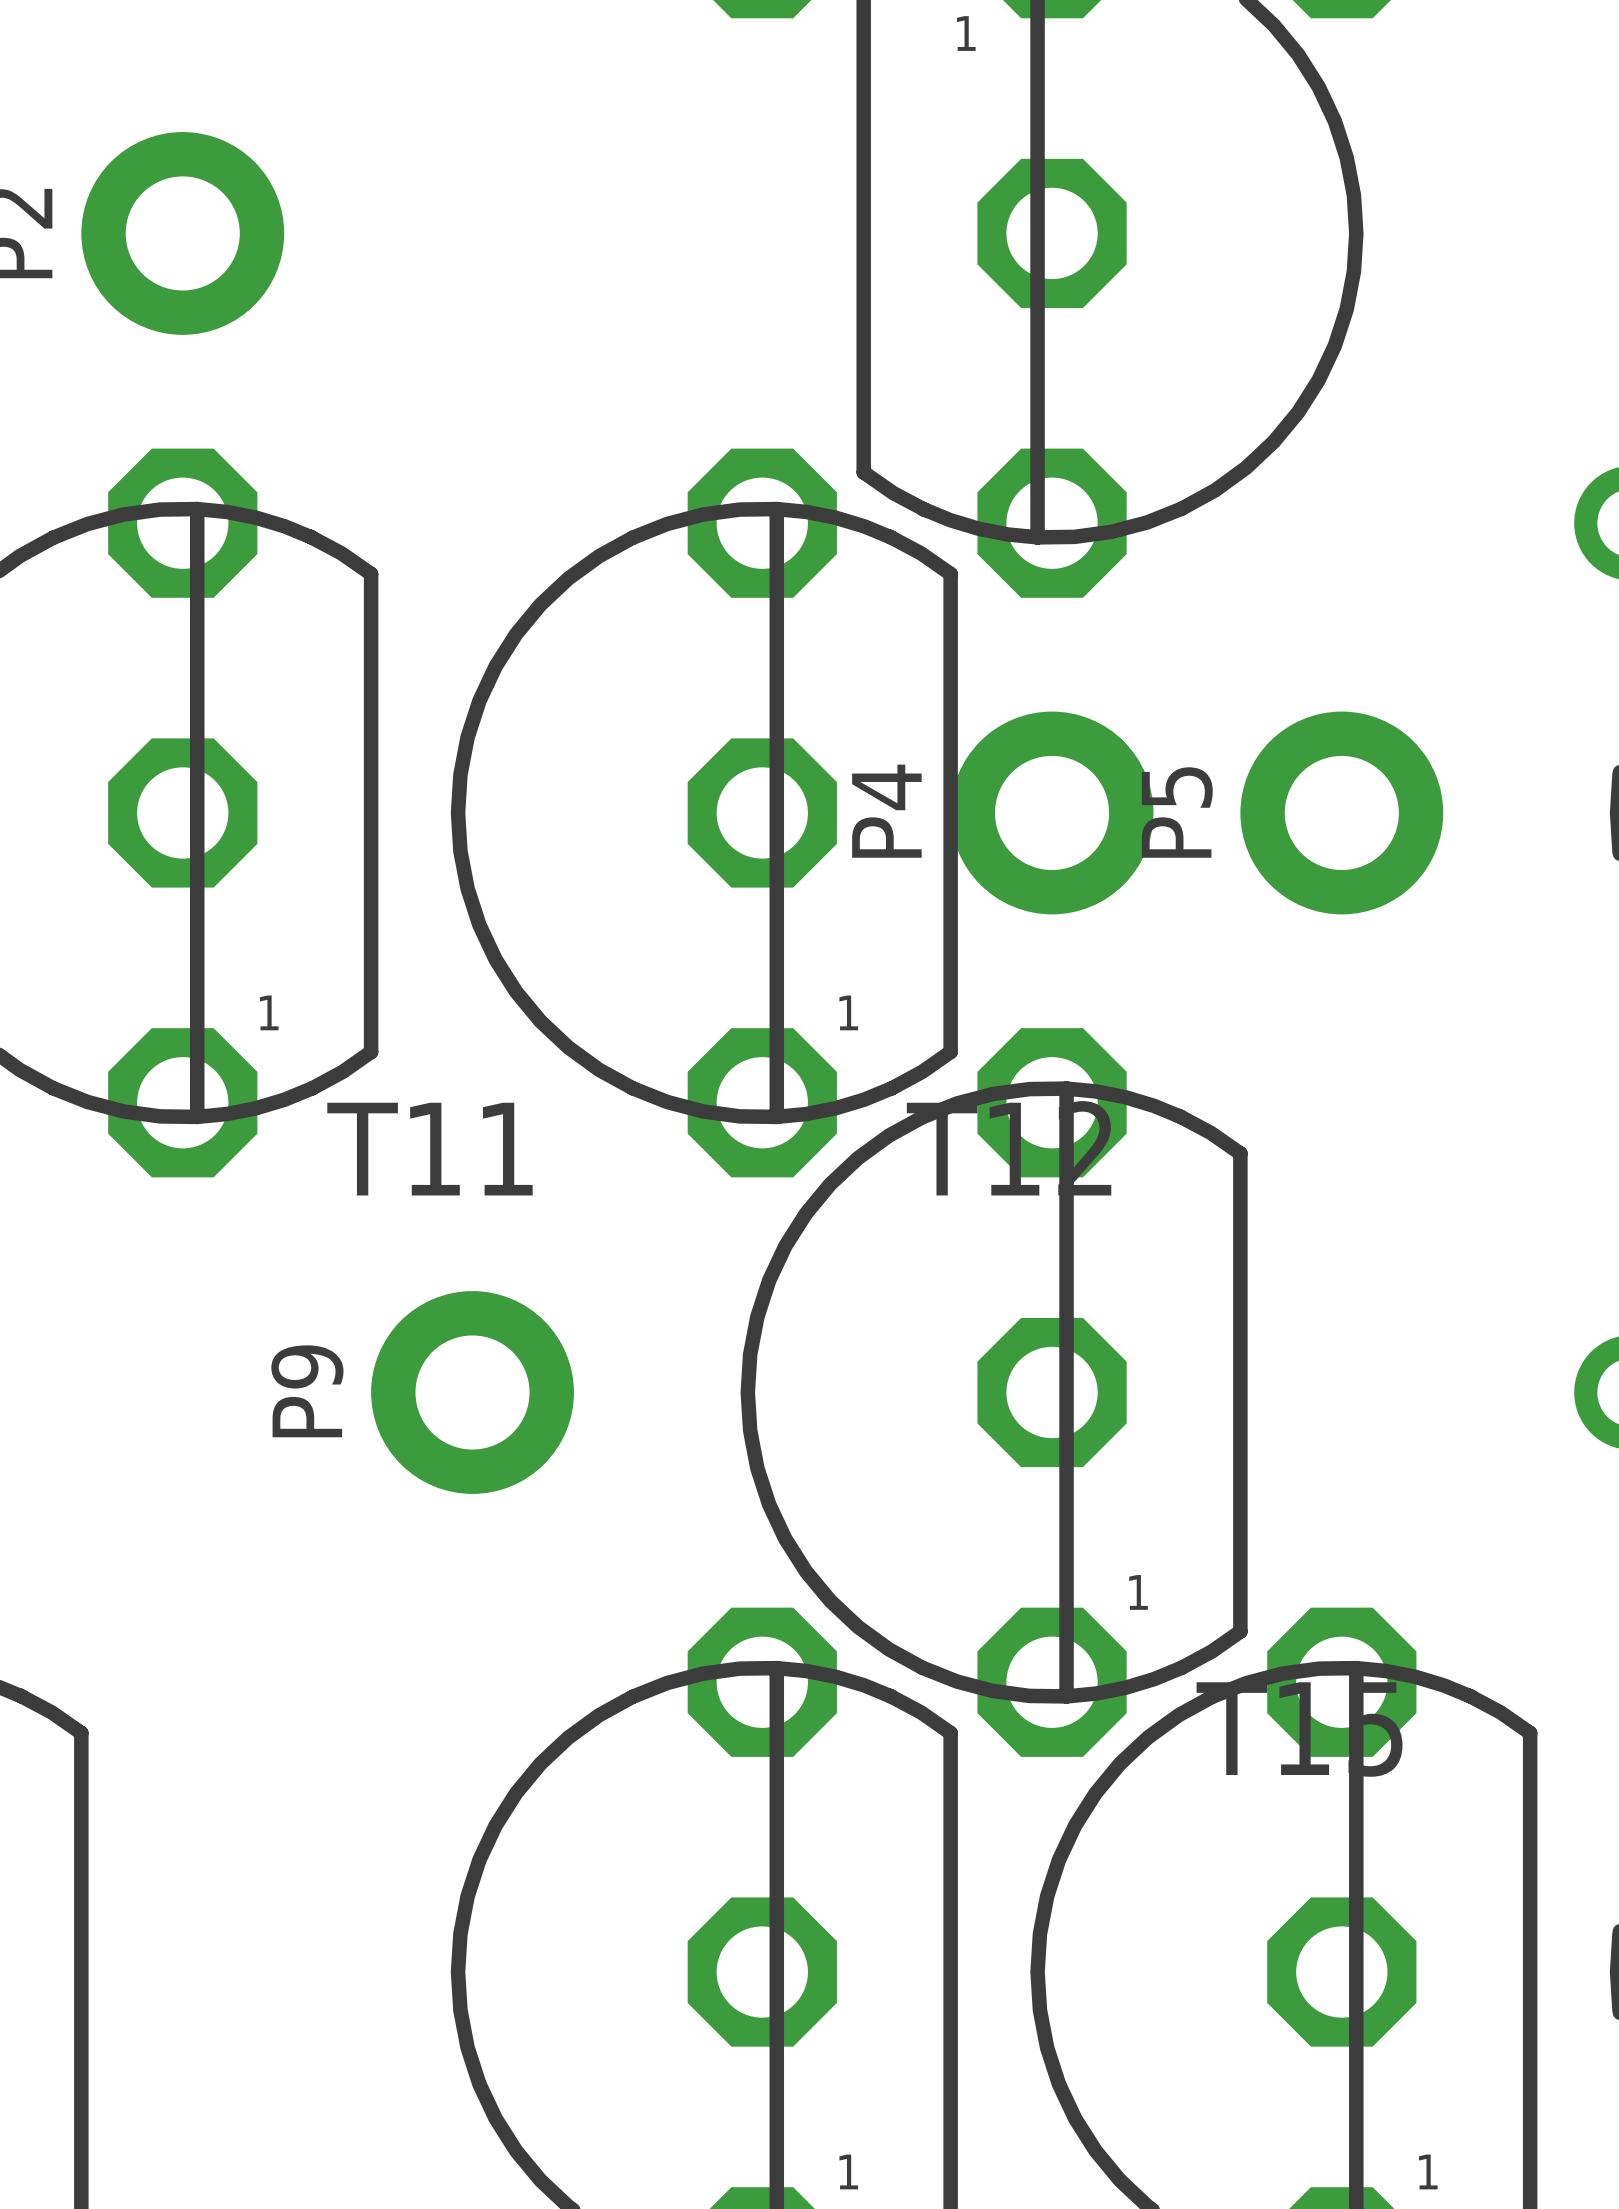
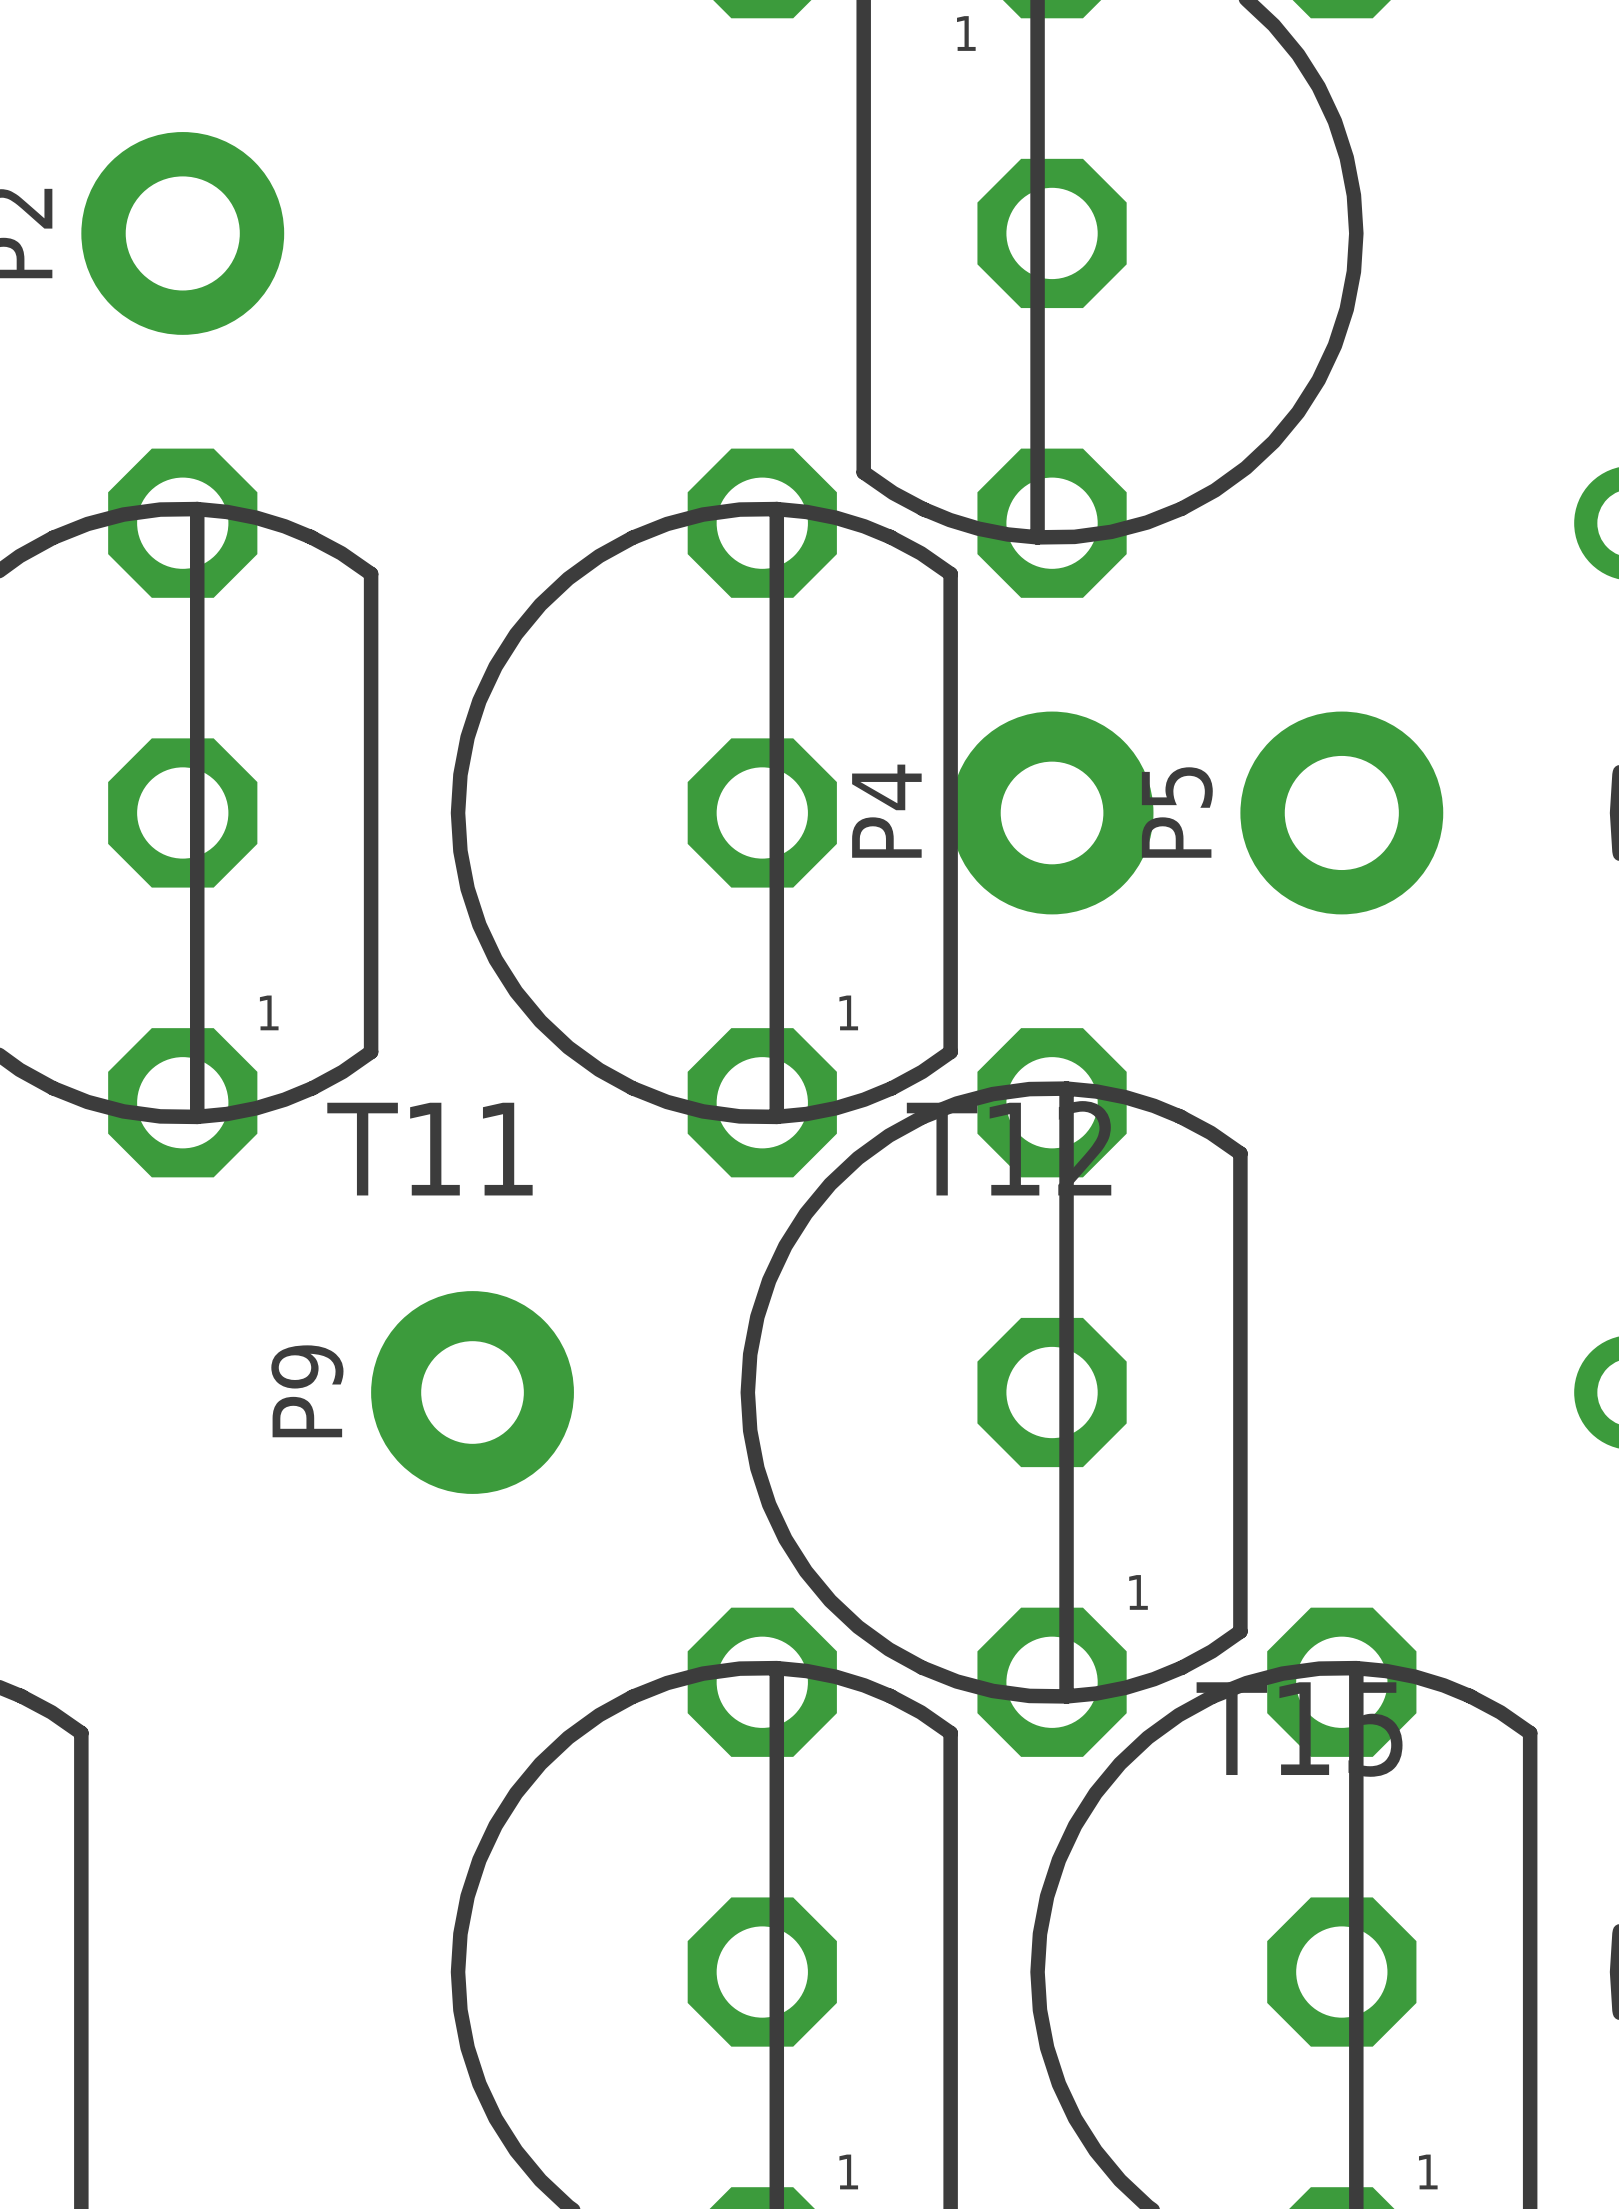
P4 footprint: [950, 711, 1154, 915] -> [950, 711, 1154, 915]
P9 footprint: [371, 1291, 574, 1494] -> [371, 1291, 574, 1494]

